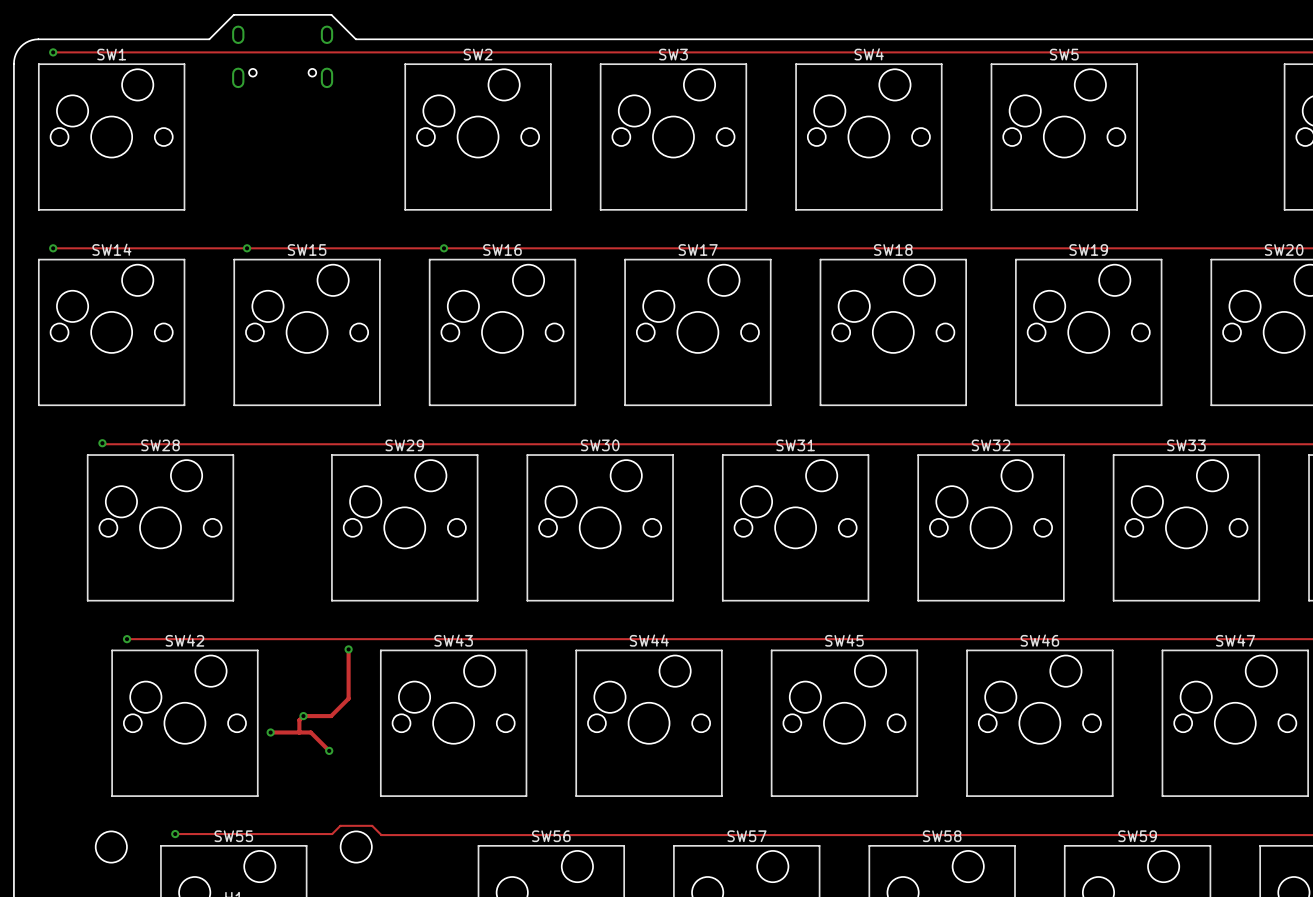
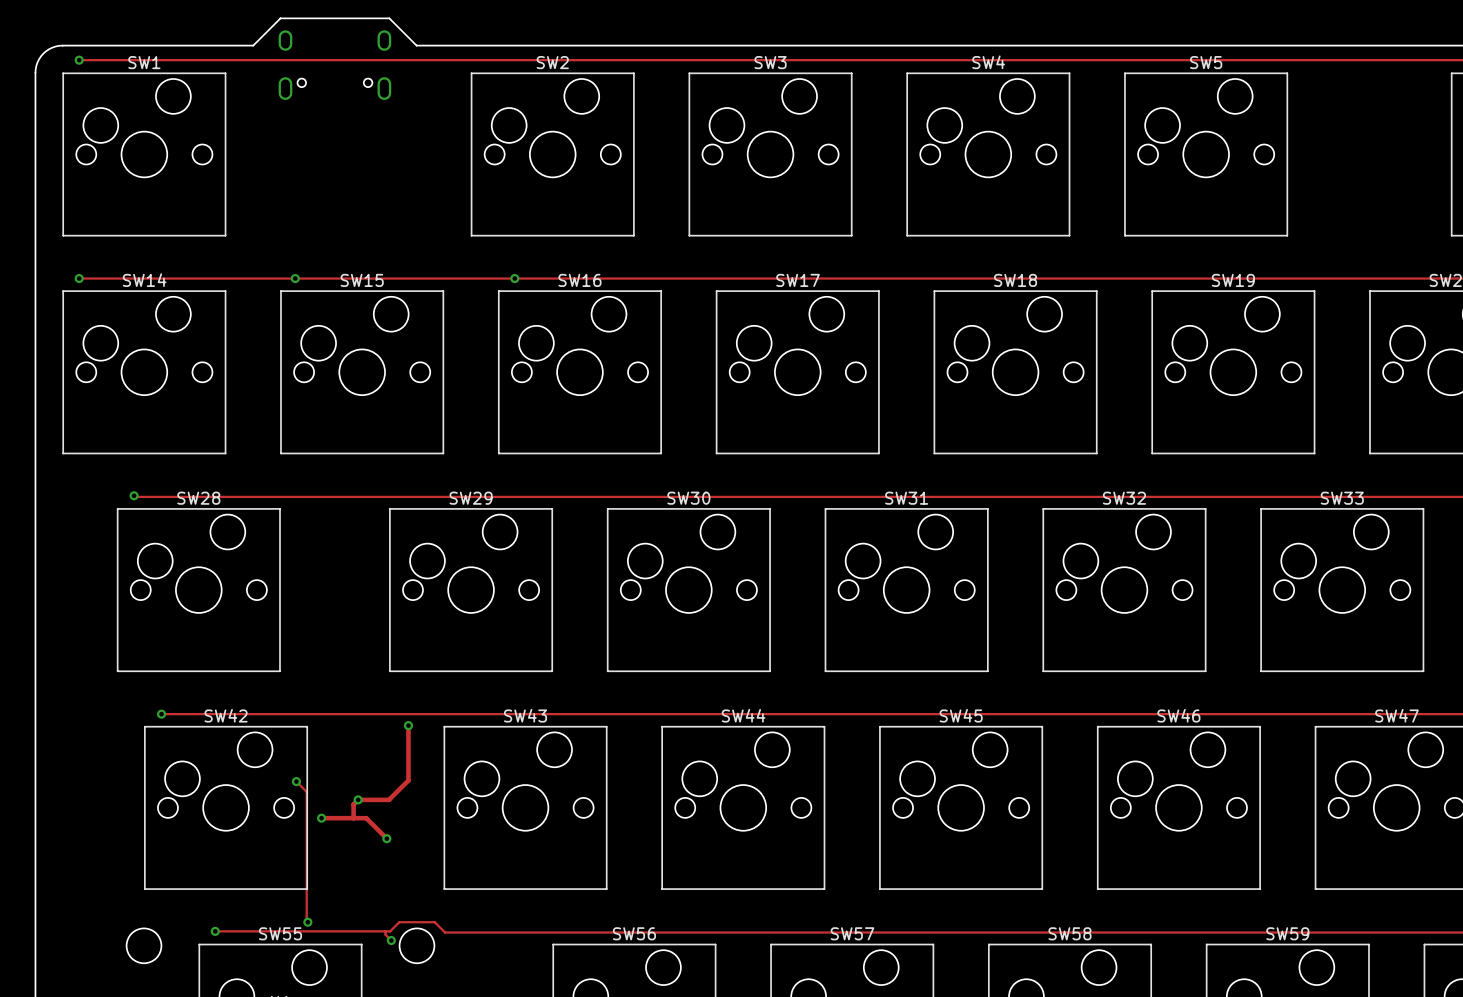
track: none -> (296, 781) (306, 791) (307, 922)
via: none -> (296, 781)
via: none -> (307, 922)
track: none -> (385, 931) (385, 934) (391, 940)
via: none -> (391, 940)

